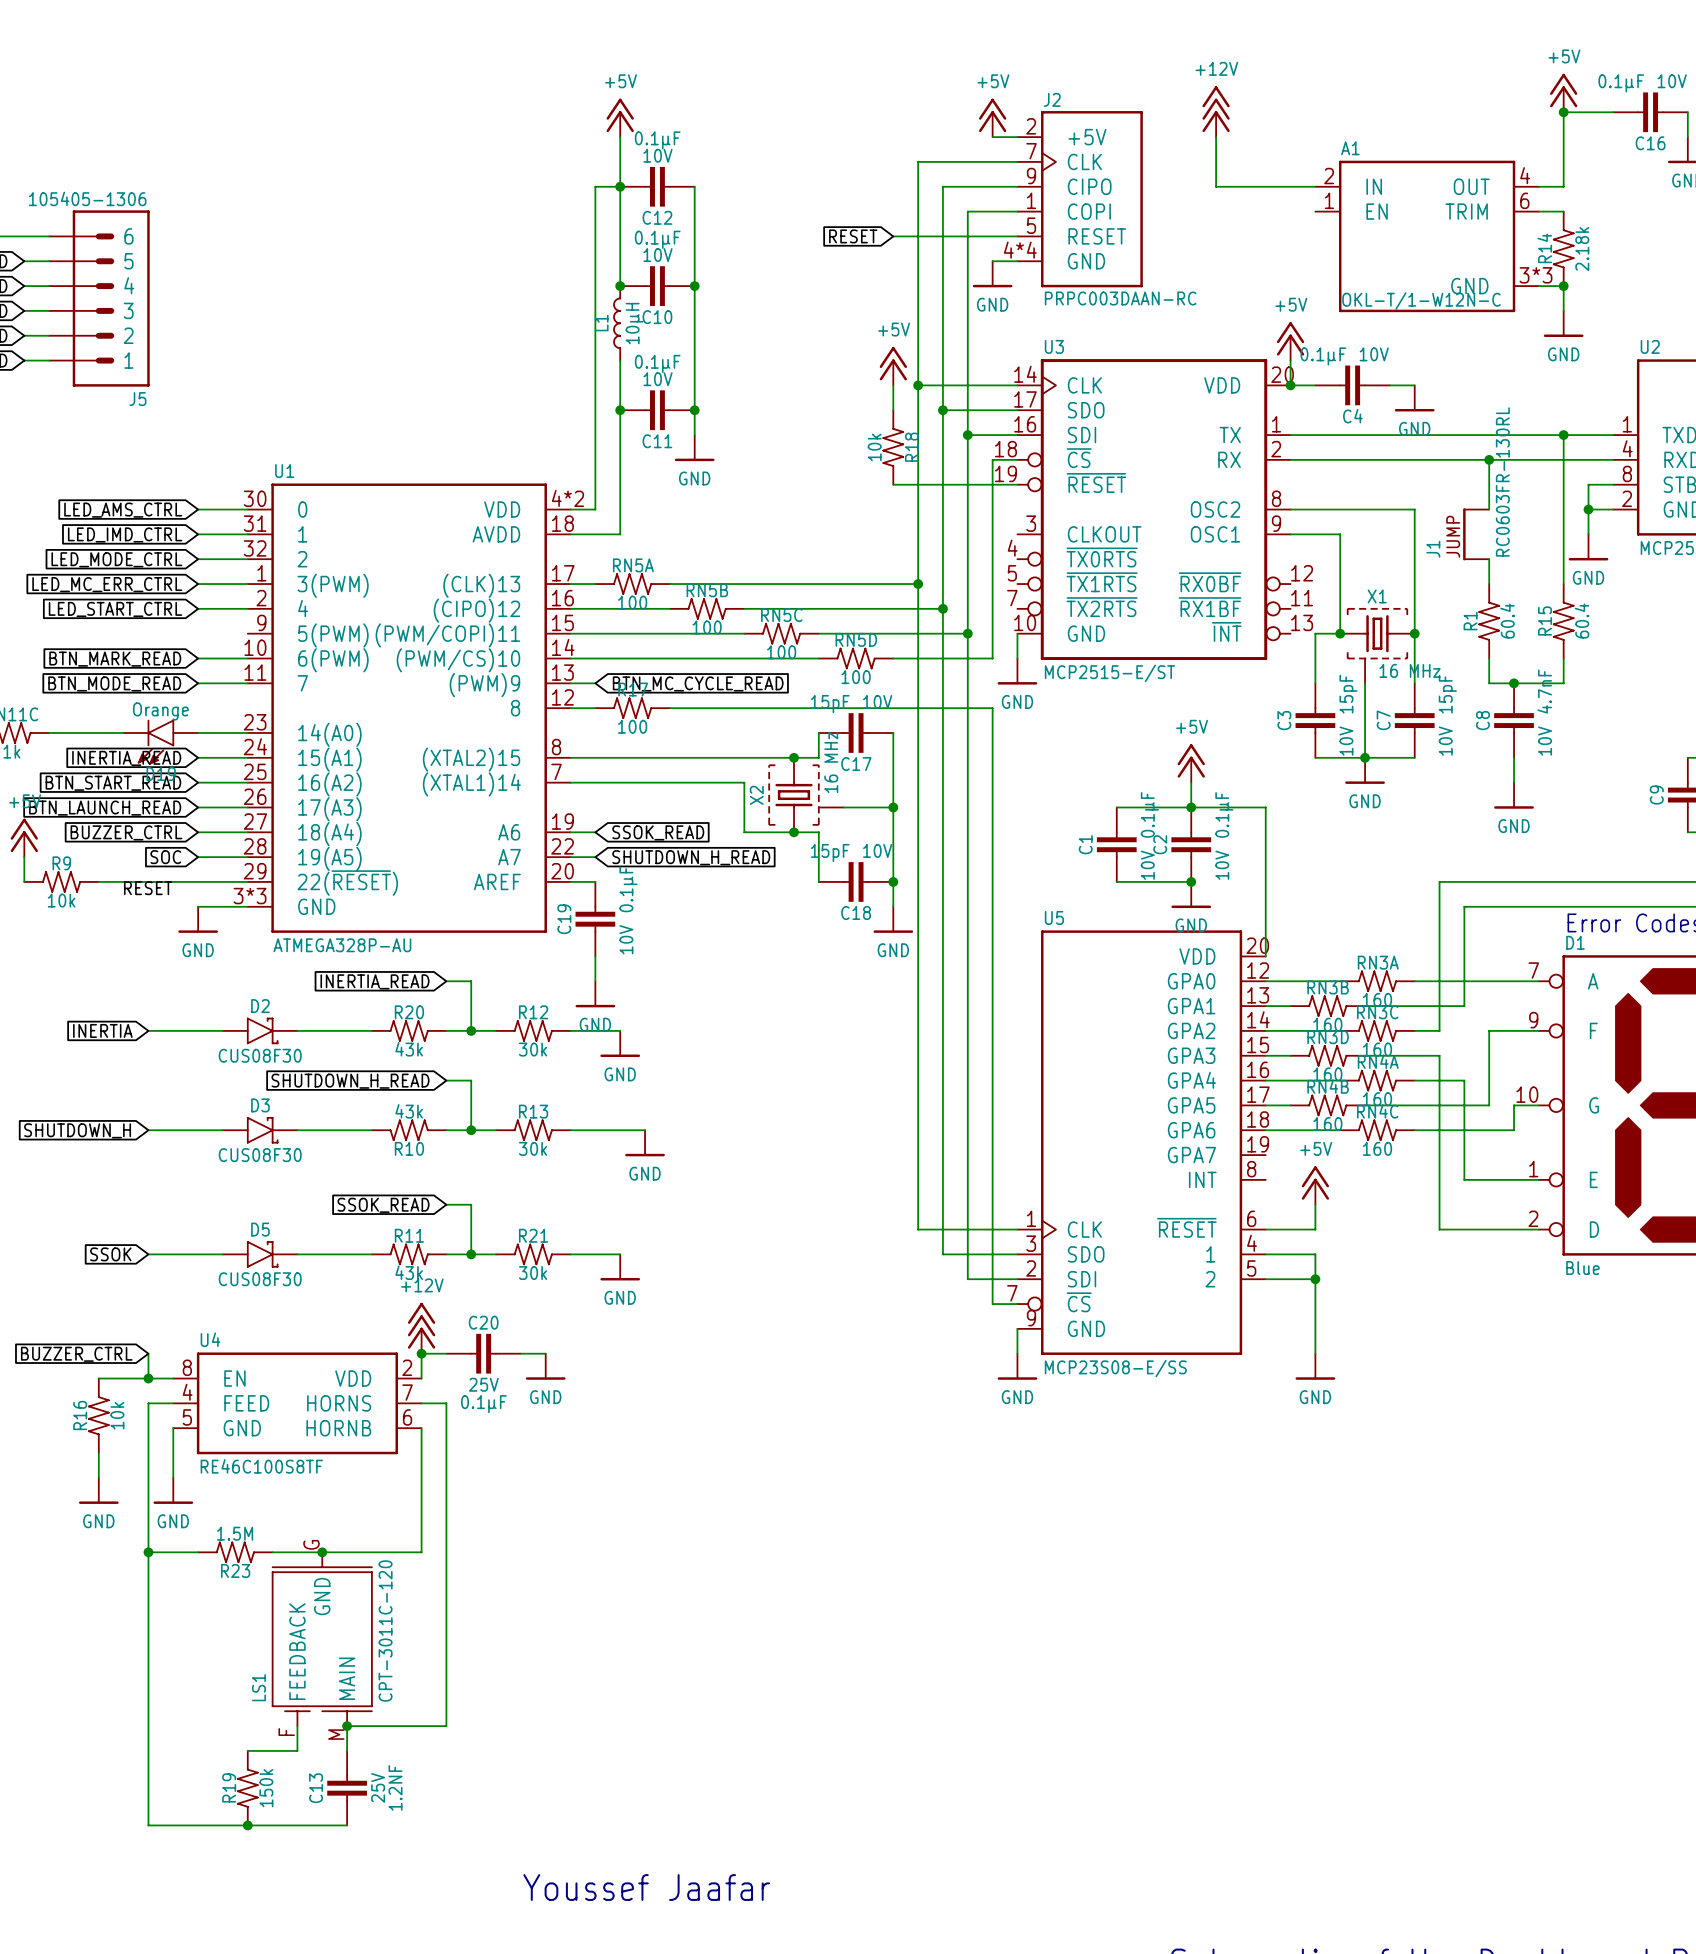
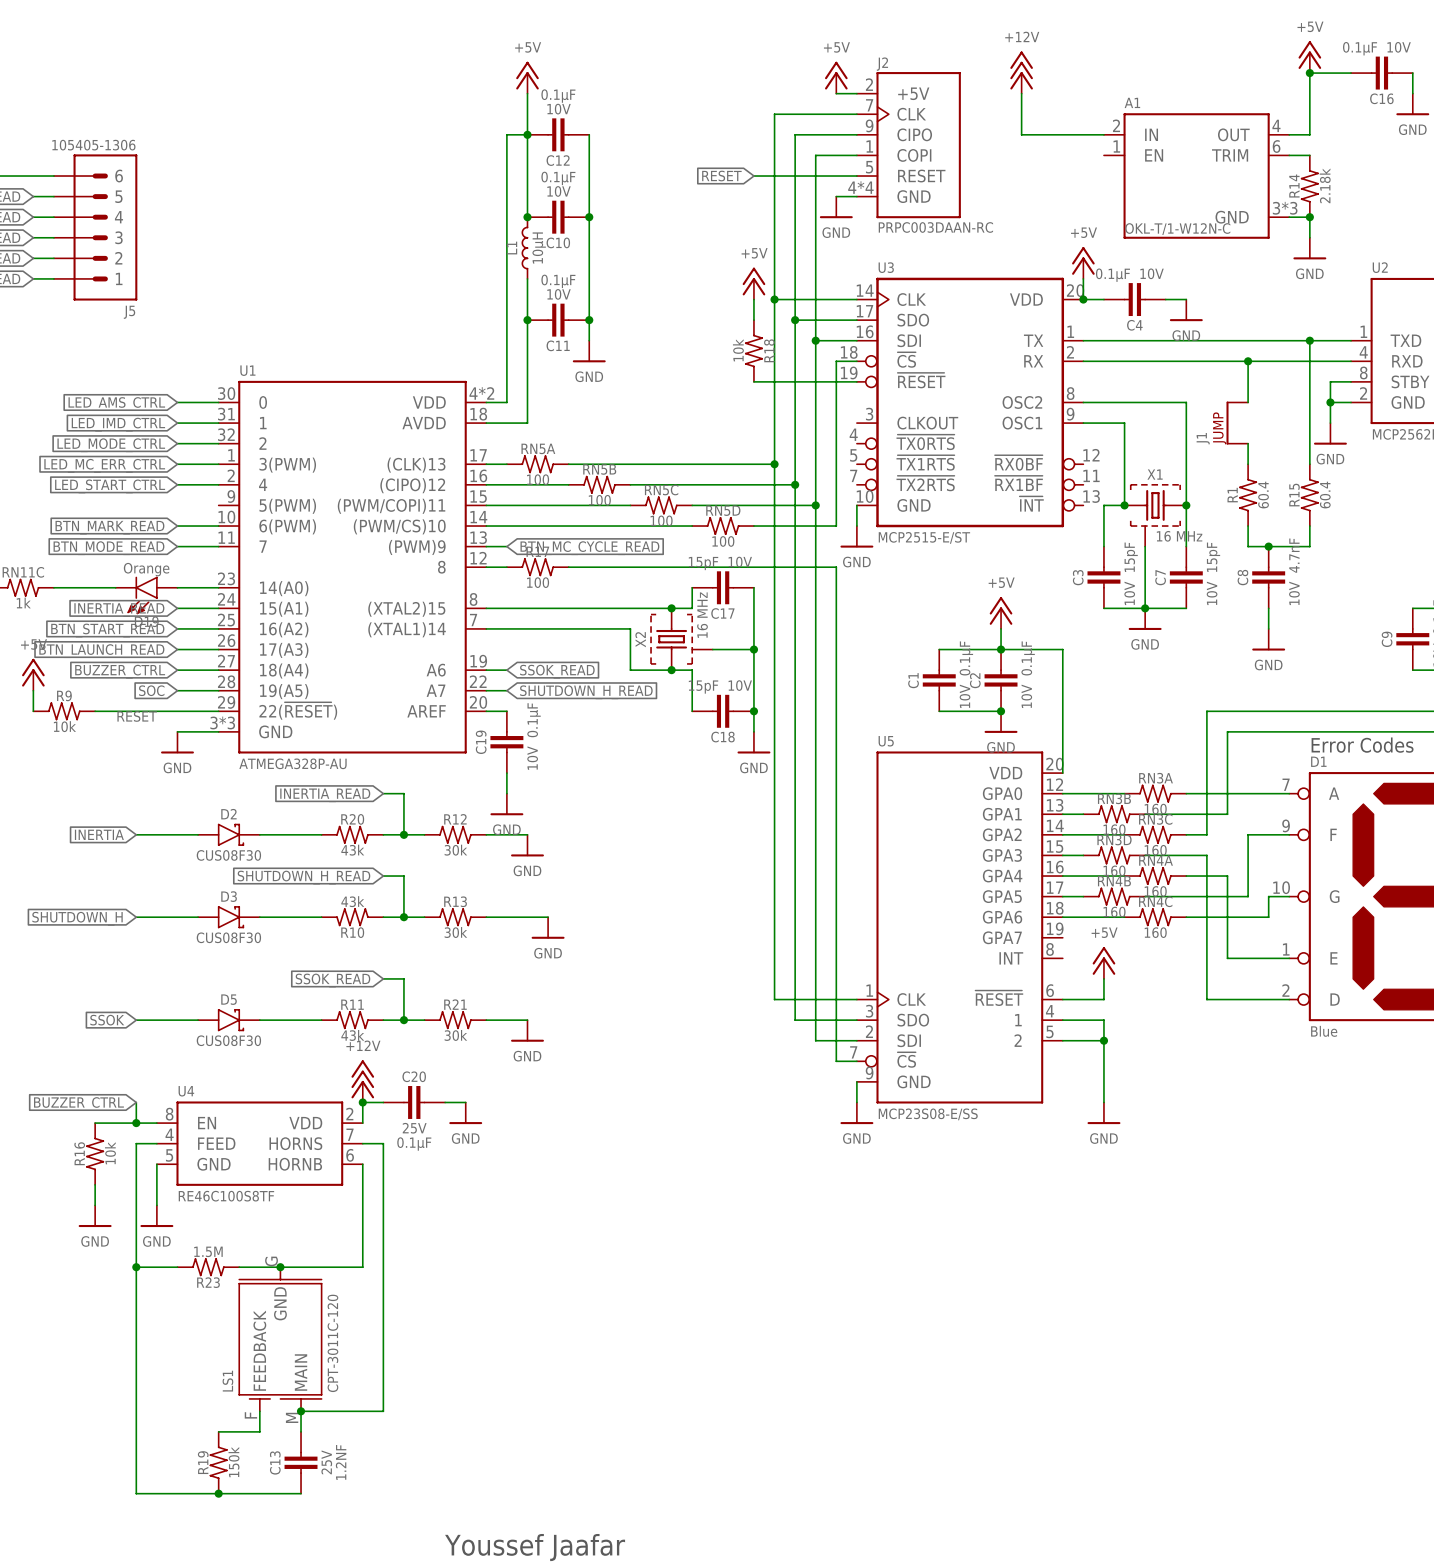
J1 text: RC0603FR-130RL (1502, 481) -> none

